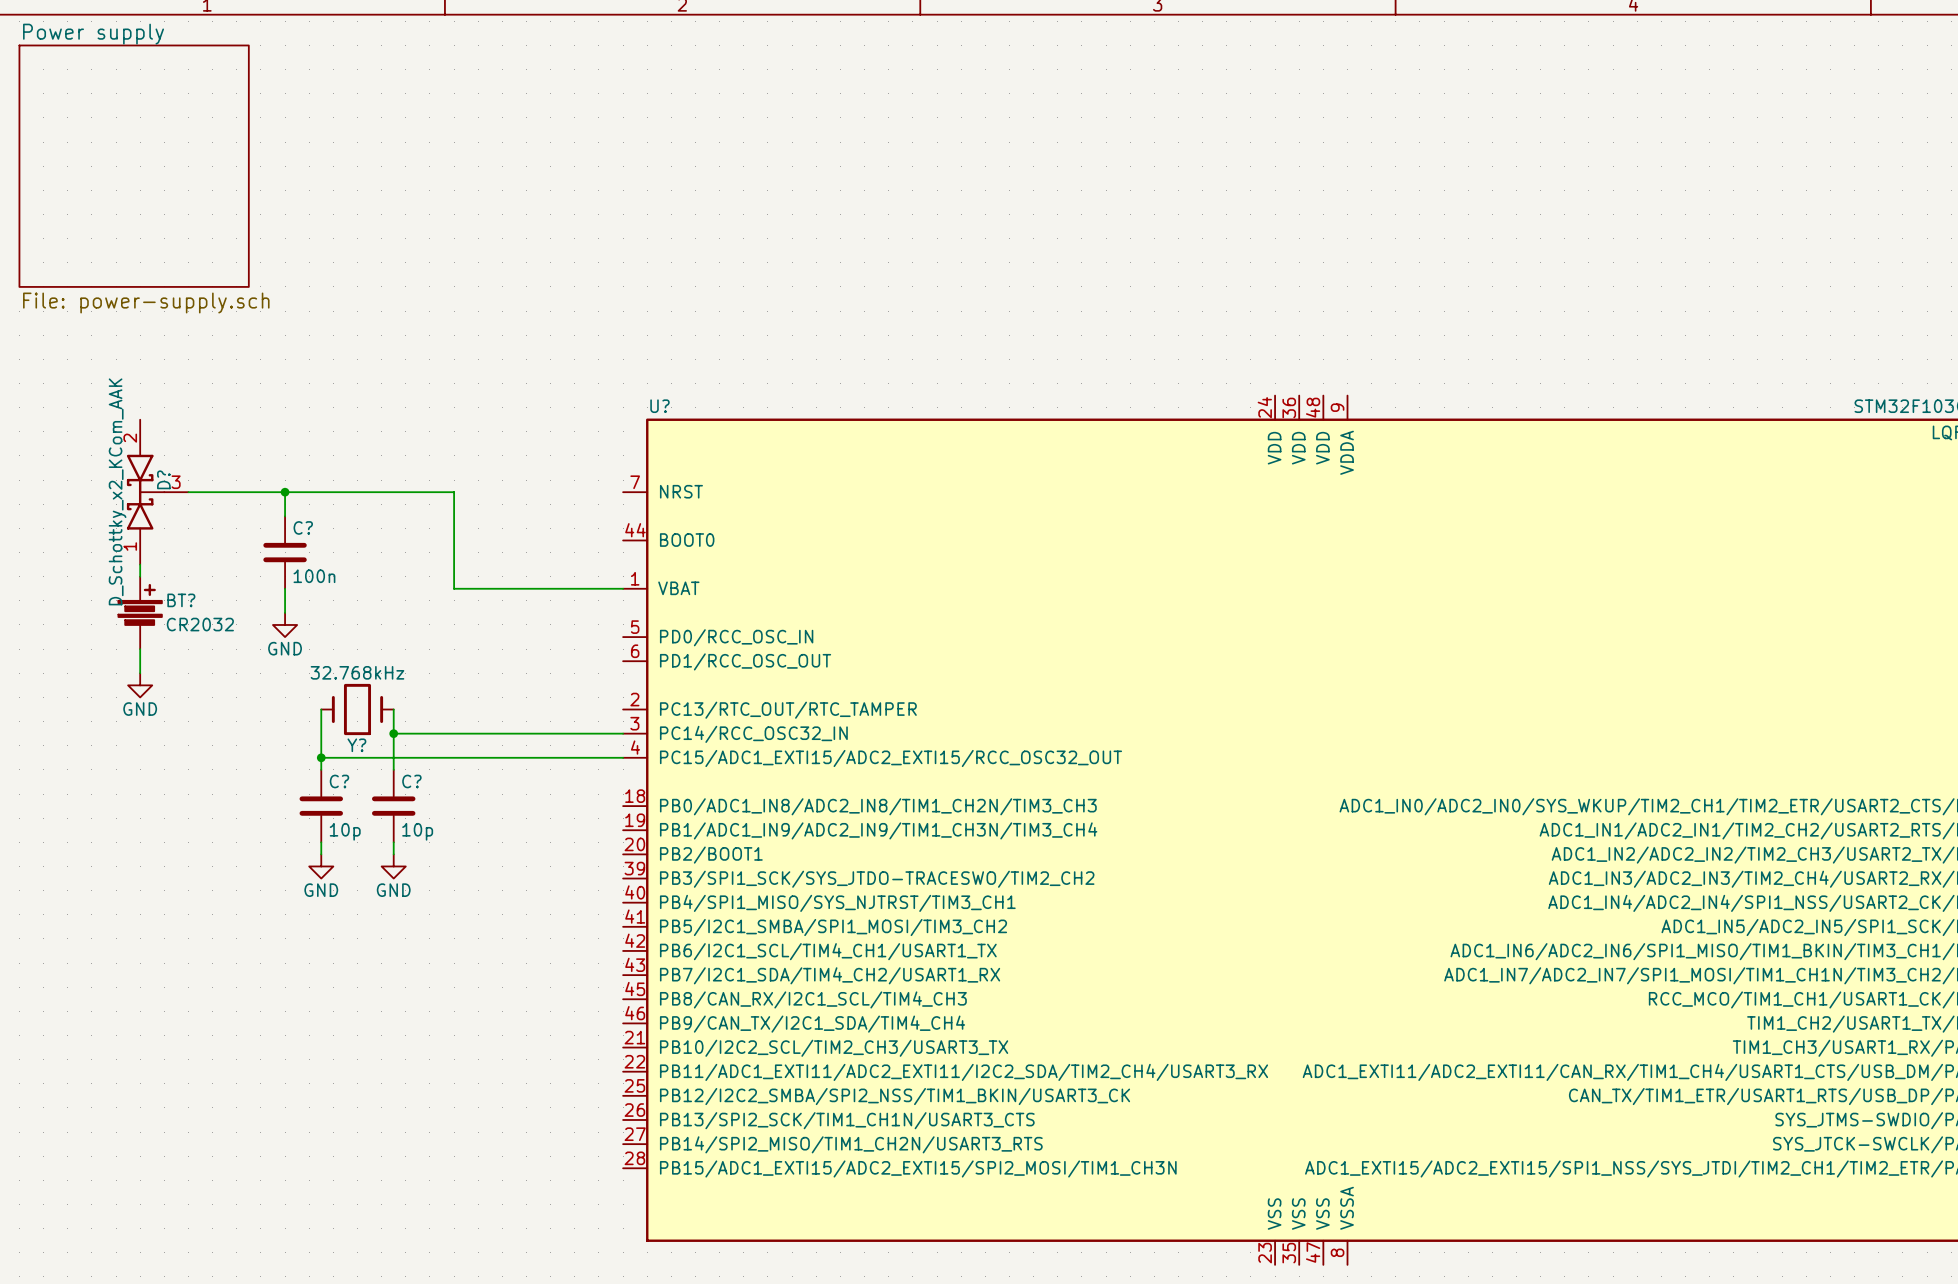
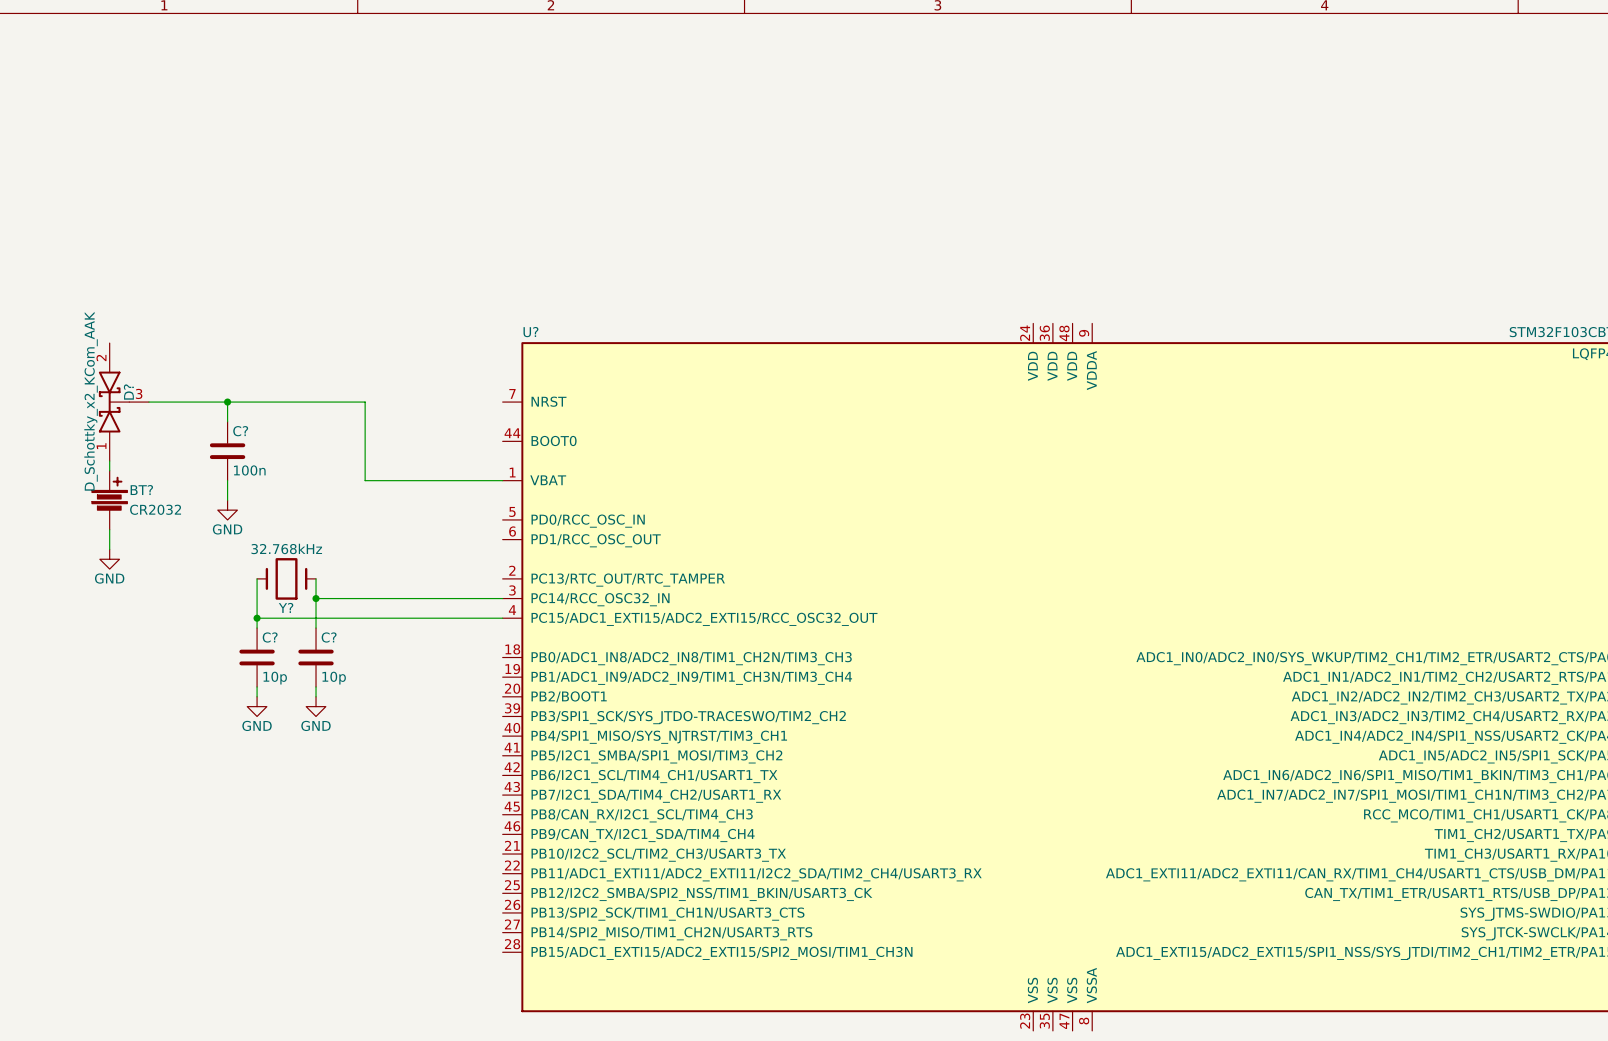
sheet Power supply: File: power-supply.sch (134, 166) -> none

